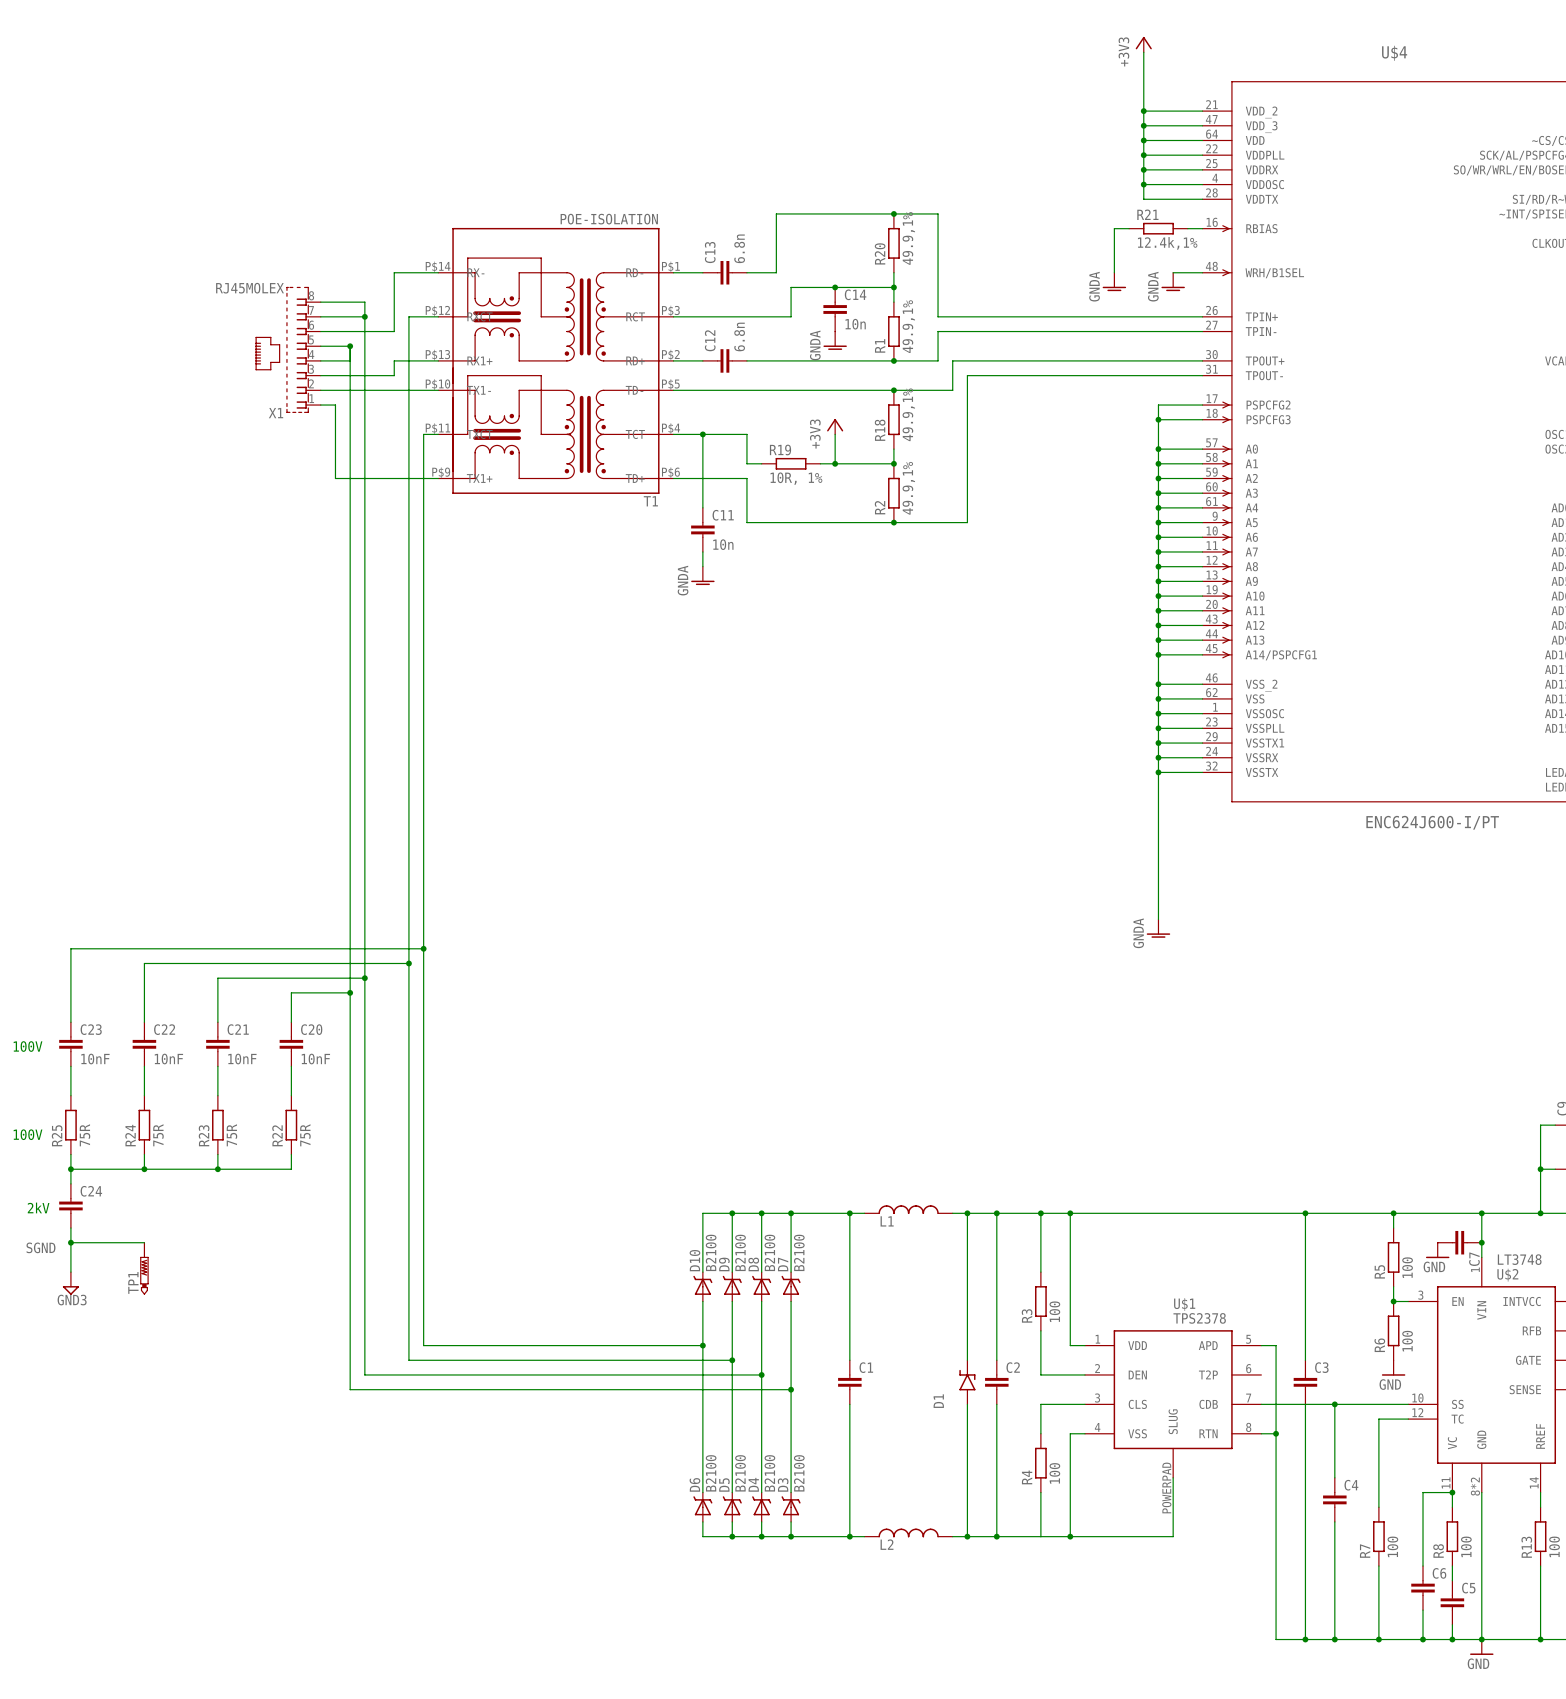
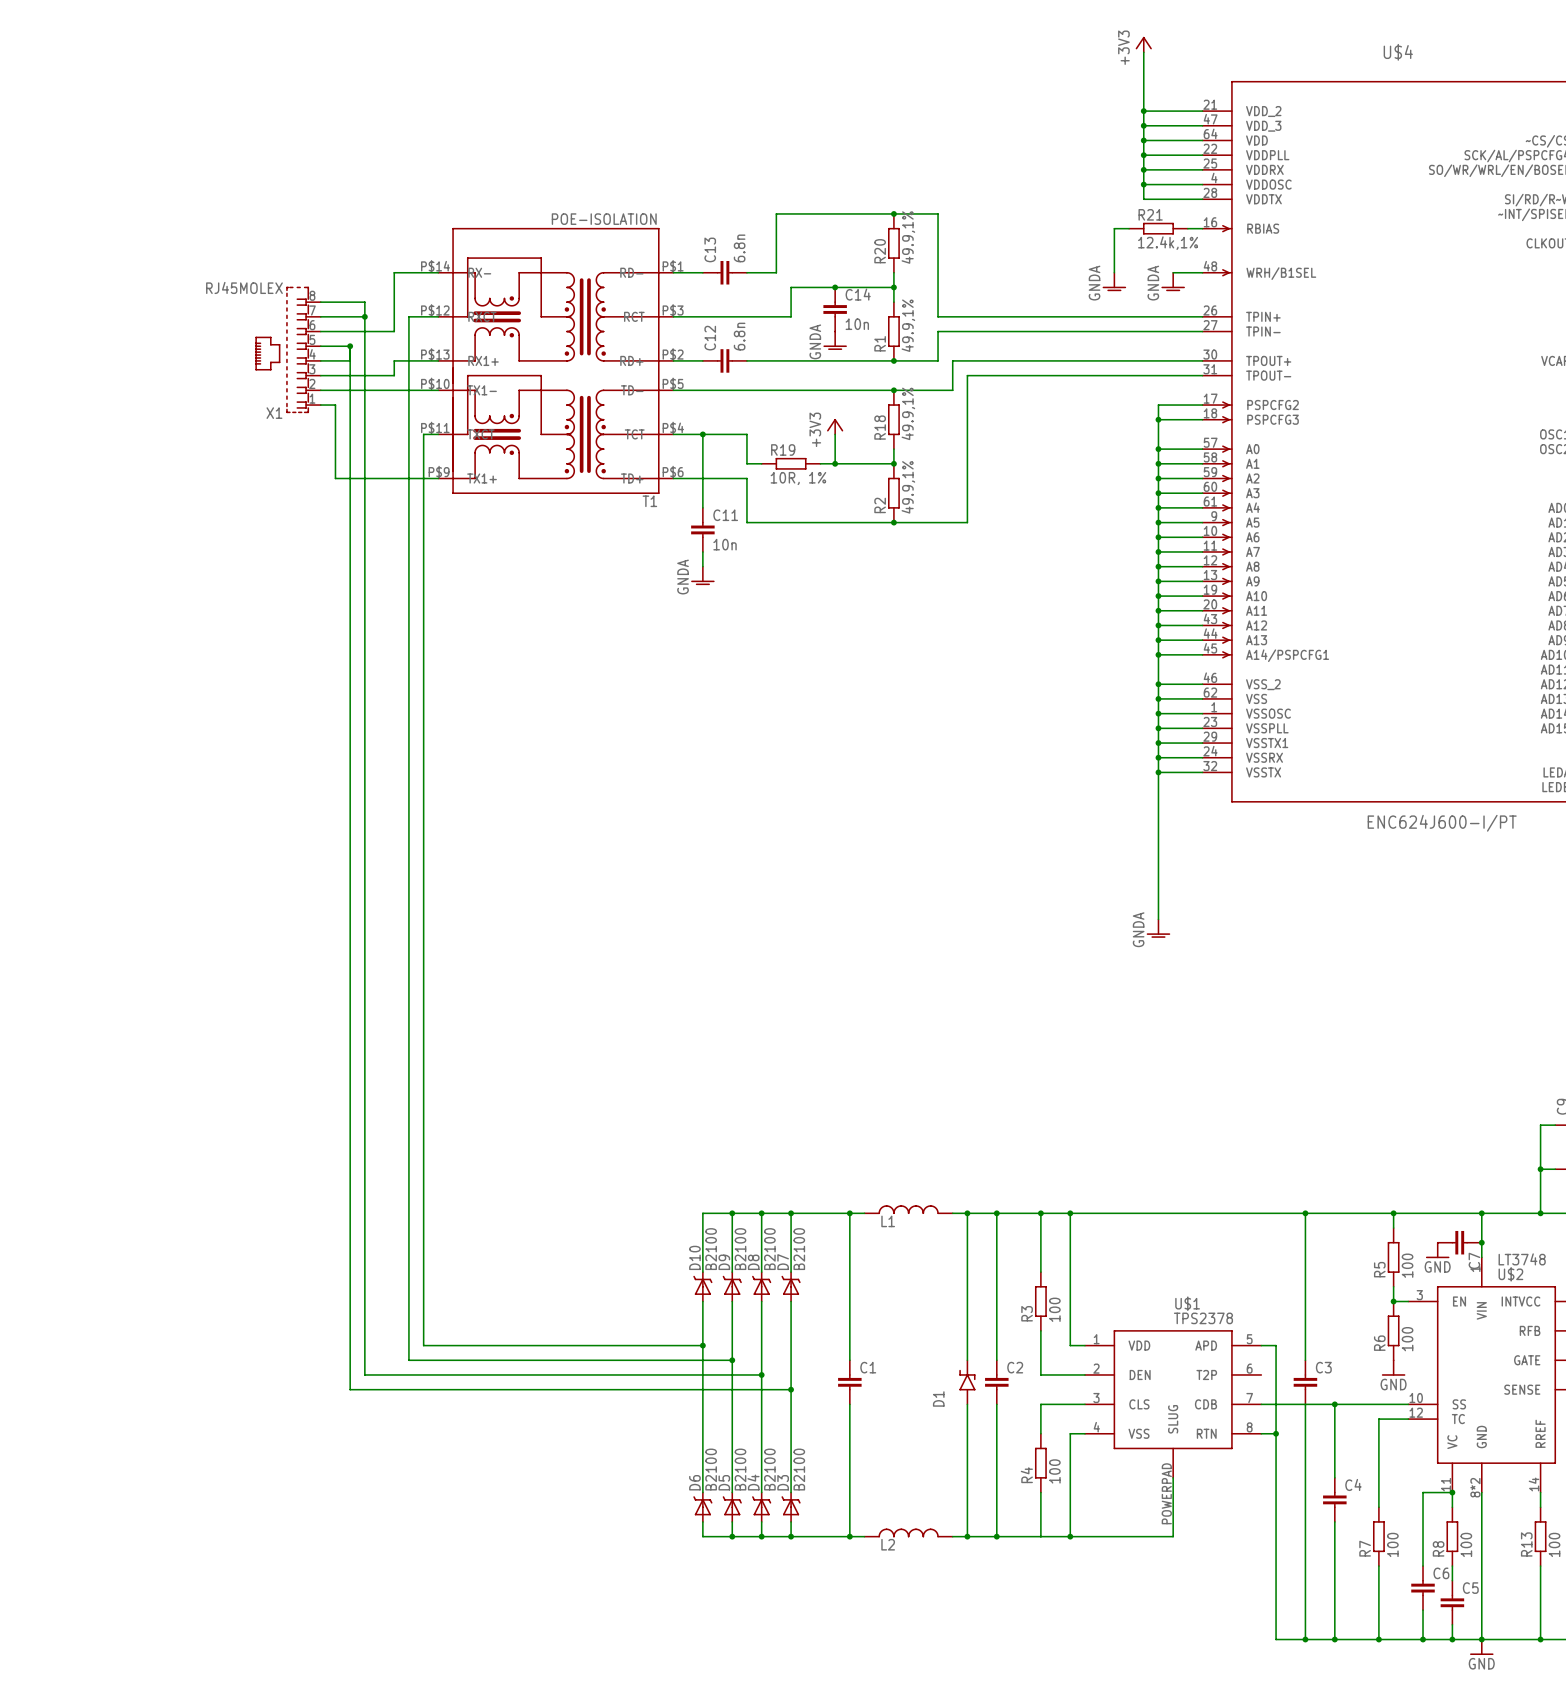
wire: (423, 948) (70, 948) (70, 1022) -> none
junction: (423, 948) -> none
wire: (408, 963) (144, 963) (144, 1022) -> none
junction: (408, 963) -> none
wire: (364, 978) (217, 978) (217, 1022) -> none
junction: (364, 978) -> none
wire: (350, 992) (291, 992) (291, 1022) -> none
junction: (350, 992) -> none
C23: 10nF (70, 1044) -> none
C22: 10nF (144, 1044) -> none
C21: 10nF (217, 1044) -> none
C20: 10nF (291, 1044) -> none
text: 100V (28, 1046) -> none
wire: (70, 1066) (70, 1095) -> none
wire: (144, 1066) (144, 1095) -> none
wire: (217, 1066) (217, 1095) -> none
wire: (291, 1066) (291, 1095) -> none
R25: 75R (70, 1125) -> none
R24: 75R (144, 1125) -> none
R23: 75R (217, 1125) -> none
R22: 75R (291, 1125) -> none
text: 100V (28, 1134) -> none
wire: (70, 1154) (70, 1183) -> none
wire: (144, 1154) (144, 1169) -> none
wire: (217, 1154) (217, 1169) -> none
wire: (291, 1154) (291, 1169) (70, 1169) -> none
junction: (70, 1169) -> none
junction: (144, 1169) -> none
junction: (217, 1169) -> none
C24: (70, 1205) -> none
text: 2kV (38, 1207) -> none
wire: (70, 1228) (70, 1272) -> none
wire: (70, 1242) (144, 1242) -> none
junction: (70, 1242) -> none
label: SGND (40, 1247) -> none
TP1: (144, 1268) -> none
power symbol: GND3 (70, 1283) -> none

